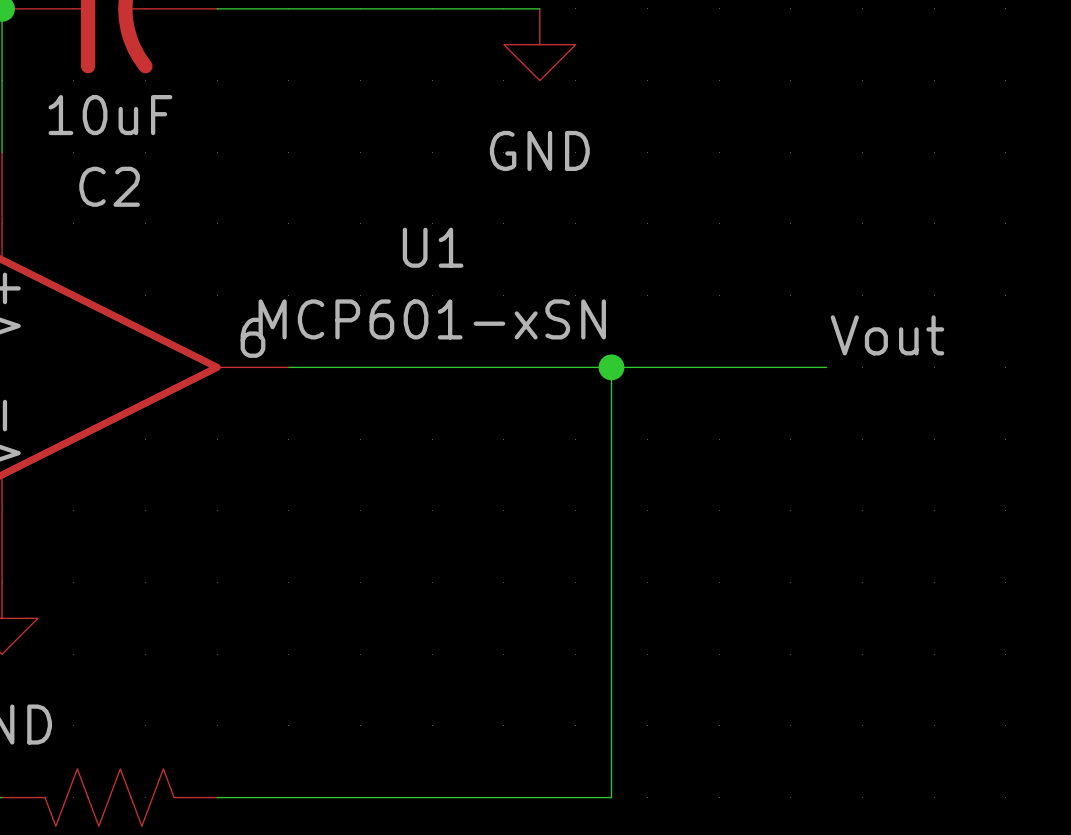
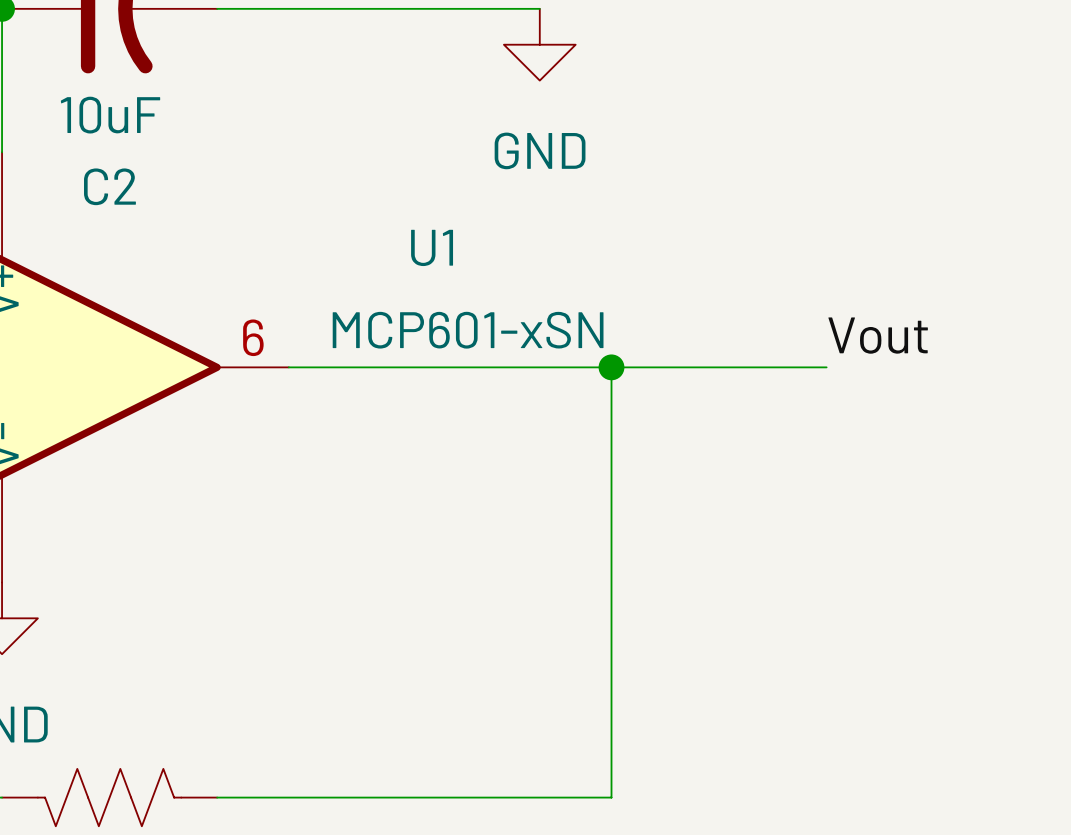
U1 value position: MCP601-xSN (432, 319) -> MCP601-xSN (468, 330)

